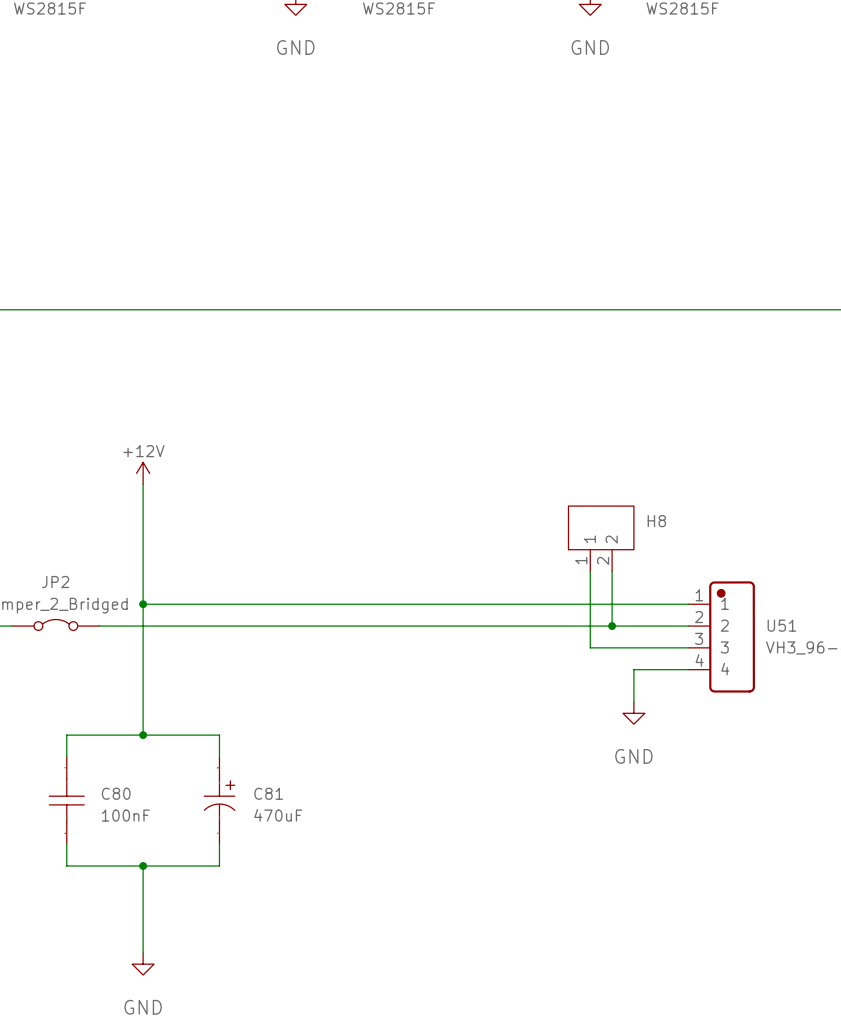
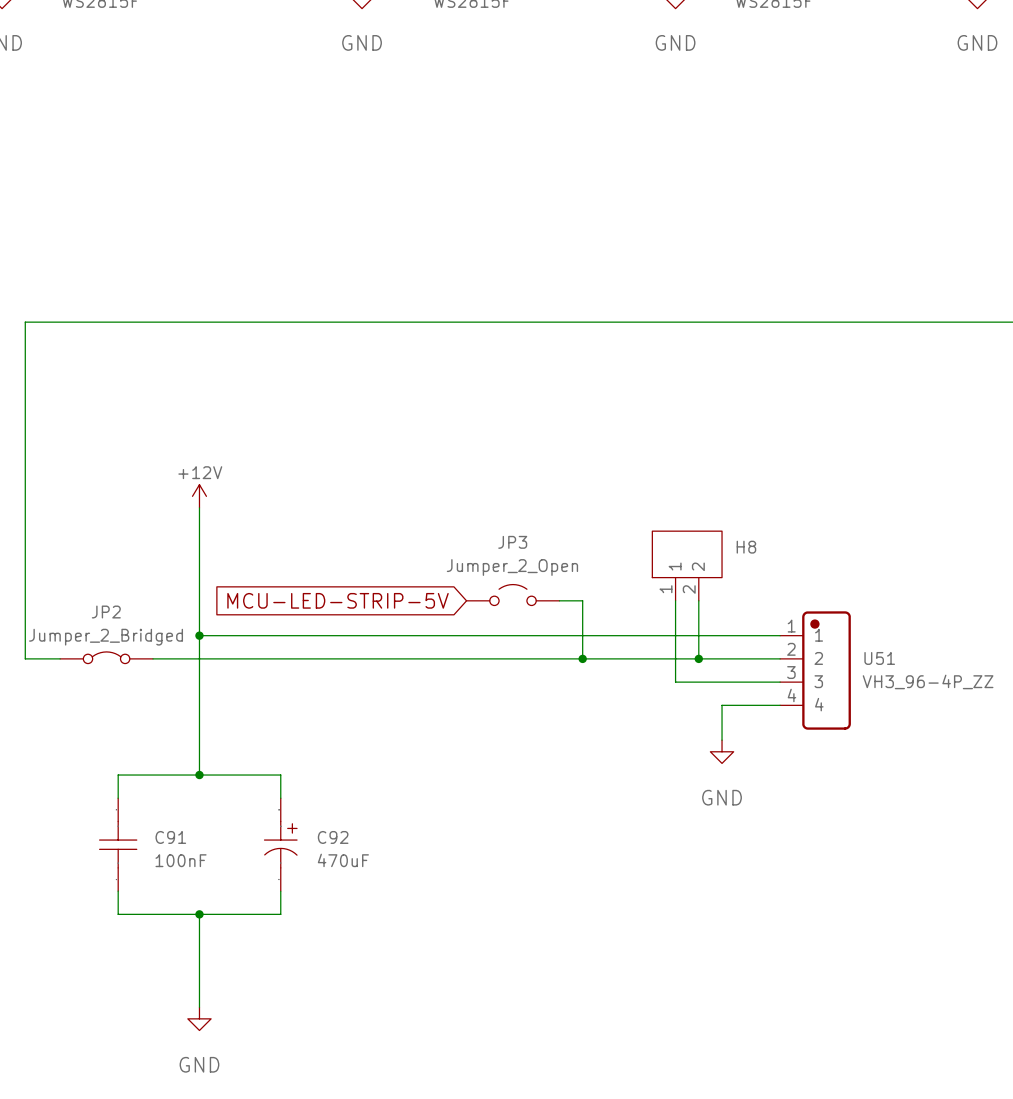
JP3: none -> Jumper_2_Open (513, 595)
global label: none -> MCU-LED-STRIP-5V (338, 600)
wire: none -> (559, 600) (582, 600) (582, 658)
junction: none -> (582, 658)
C80 name: C80 (116, 793) -> C91 (170, 837)
C81 name: C81 (268, 793) -> C92 (333, 837)

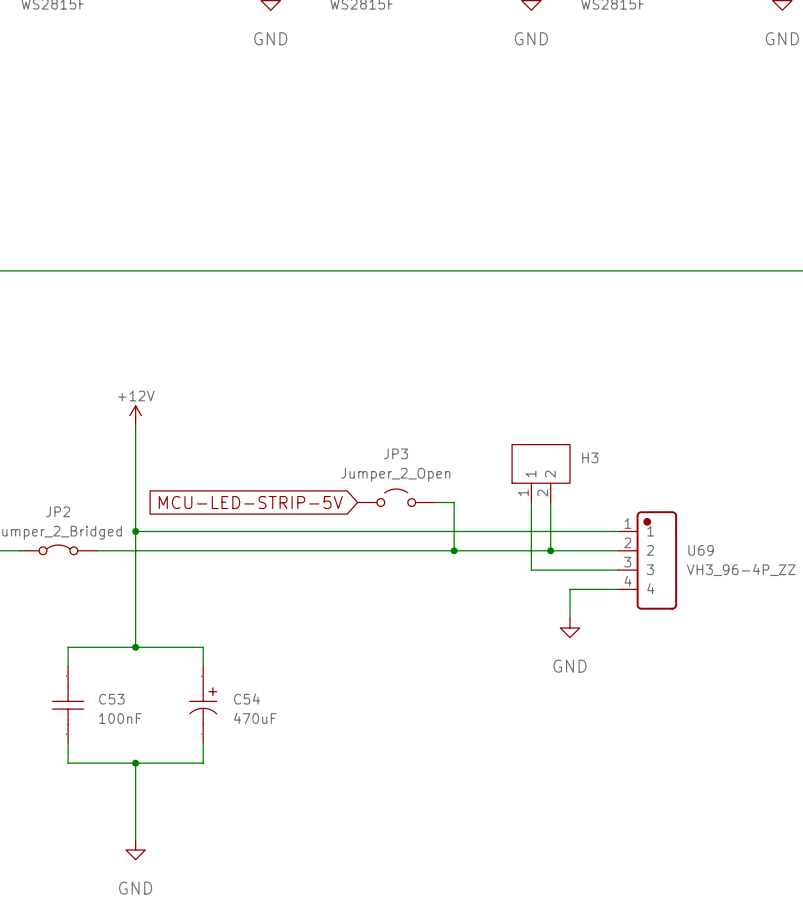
H8 name: H8 (746, 547) -> H3 (590, 457)
U51 name: U51 (879, 658) -> U69 (701, 550)
C91 name: C91 (170, 837) -> C53 (111, 699)
C92 name: C92 (333, 837) -> C54 (246, 698)

